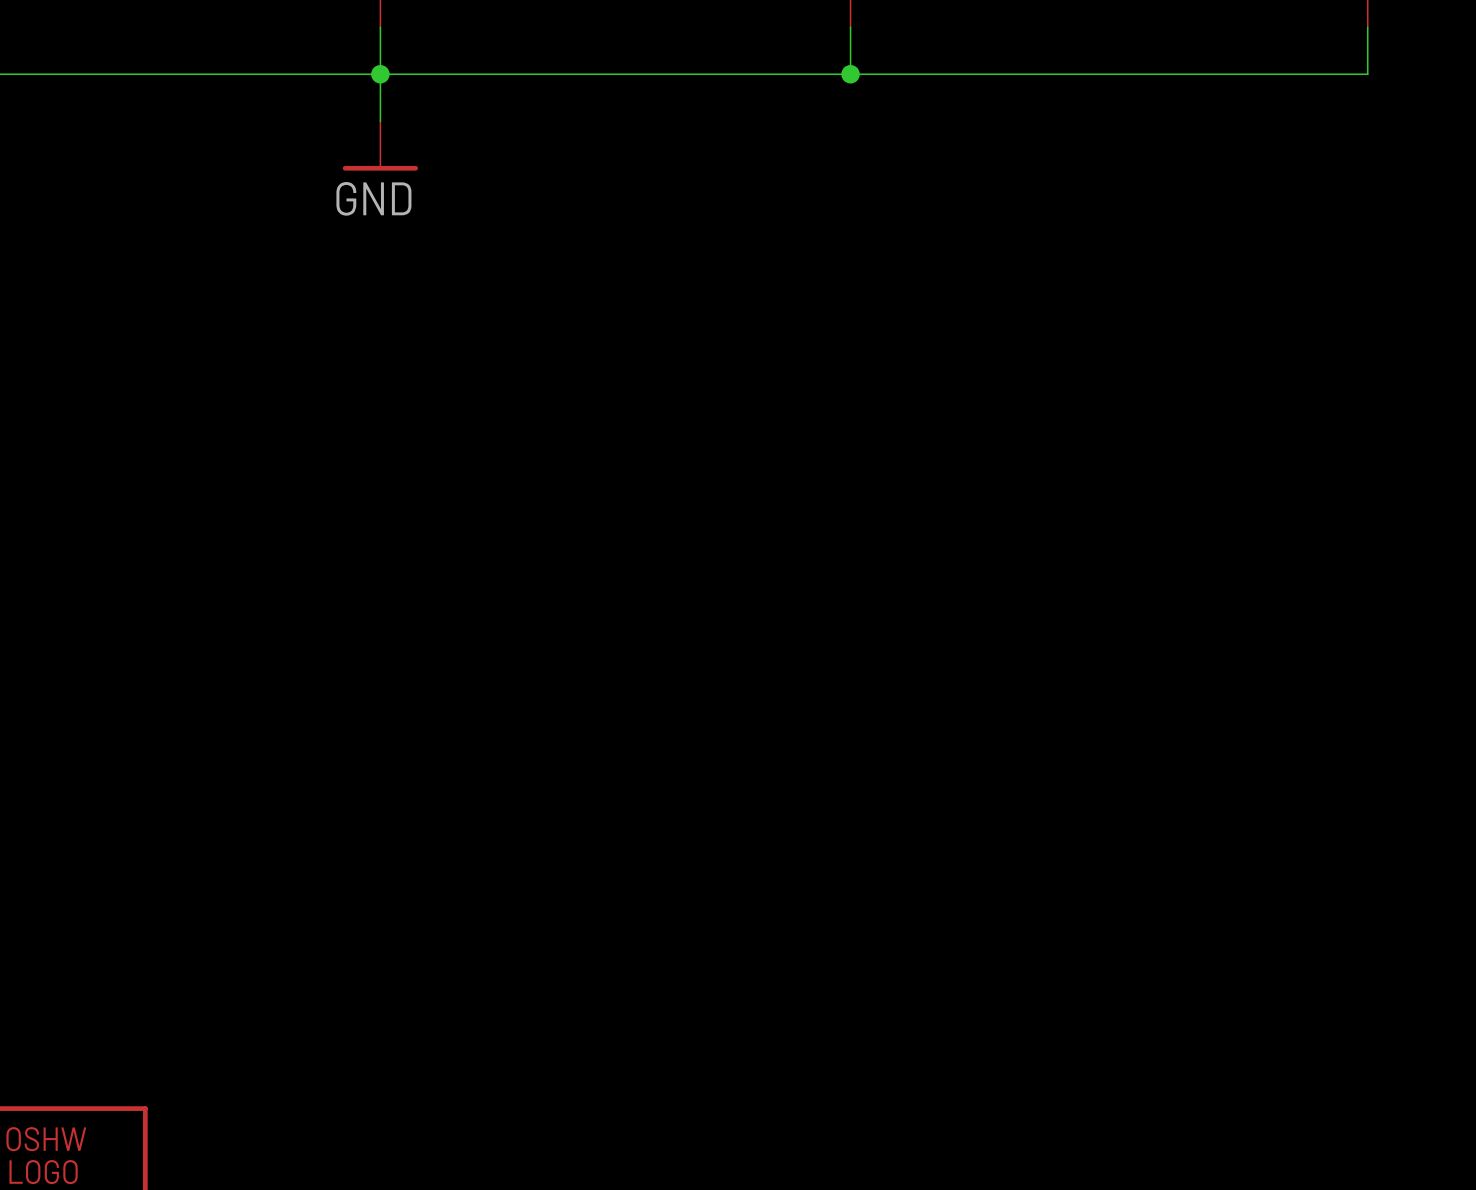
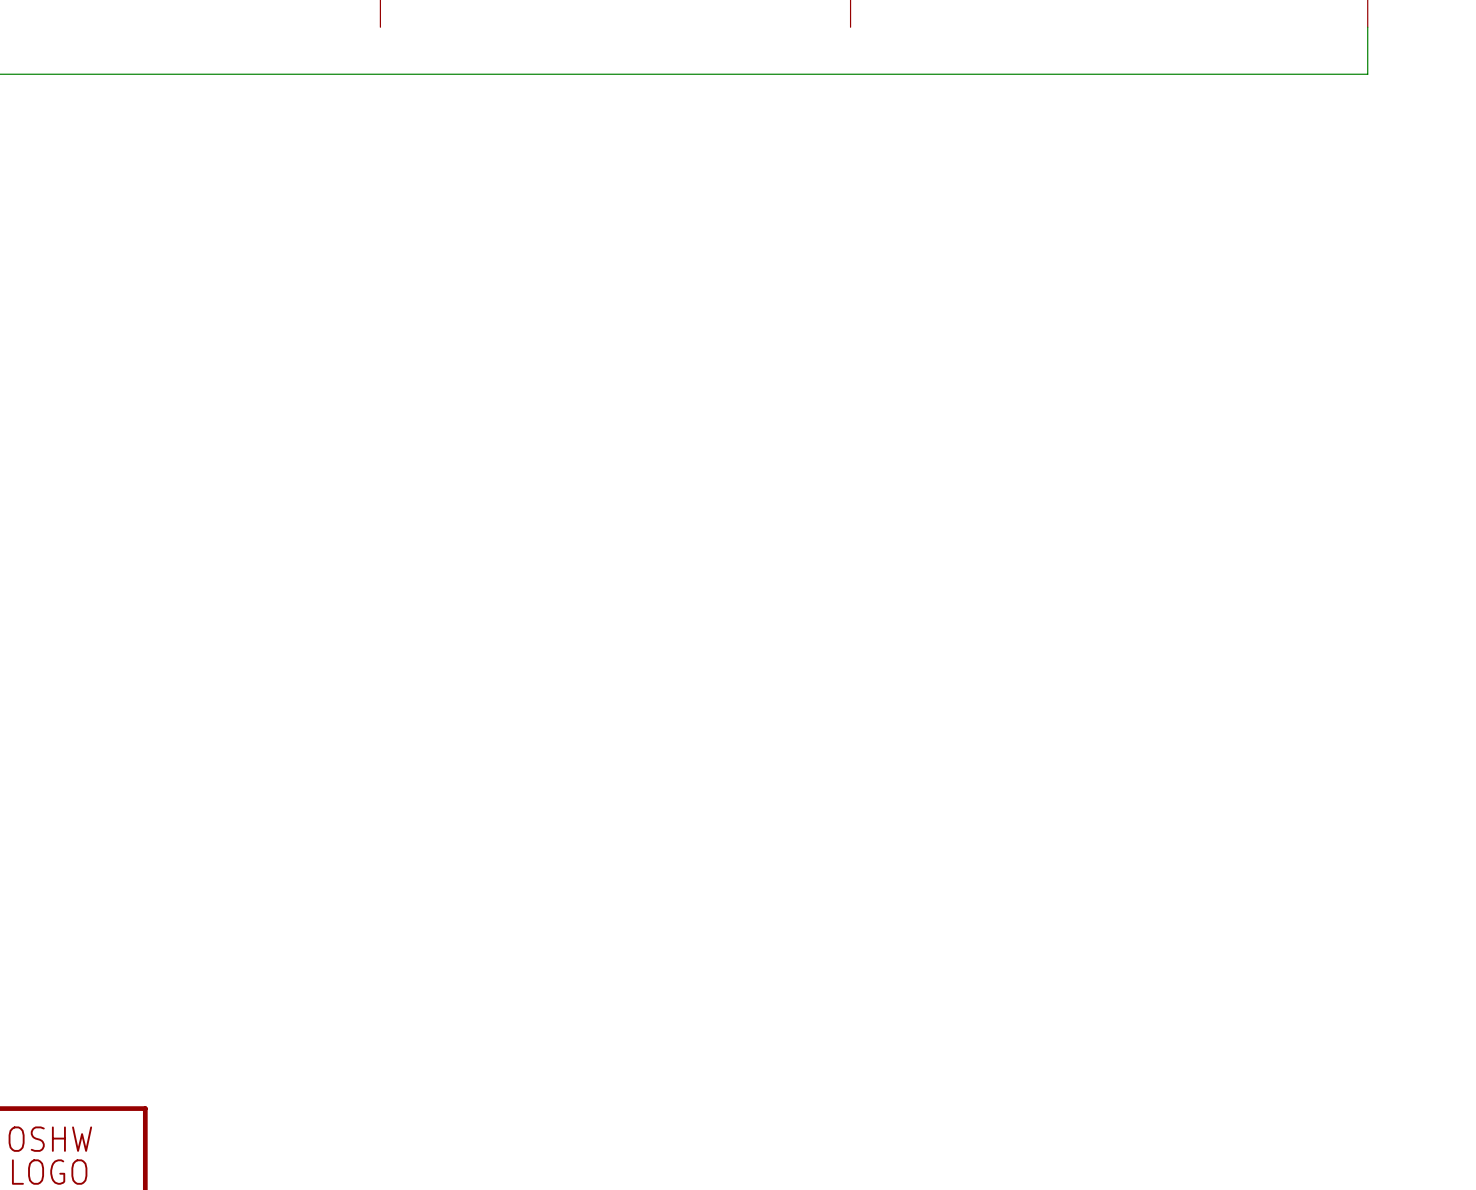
wire: (380, 27) (380, 121) -> none
wire: (850, 27) (850, 74) -> none
junction: (380, 74) -> none
junction: (850, 74) -> none
power symbol: GND (380, 145) -> none

